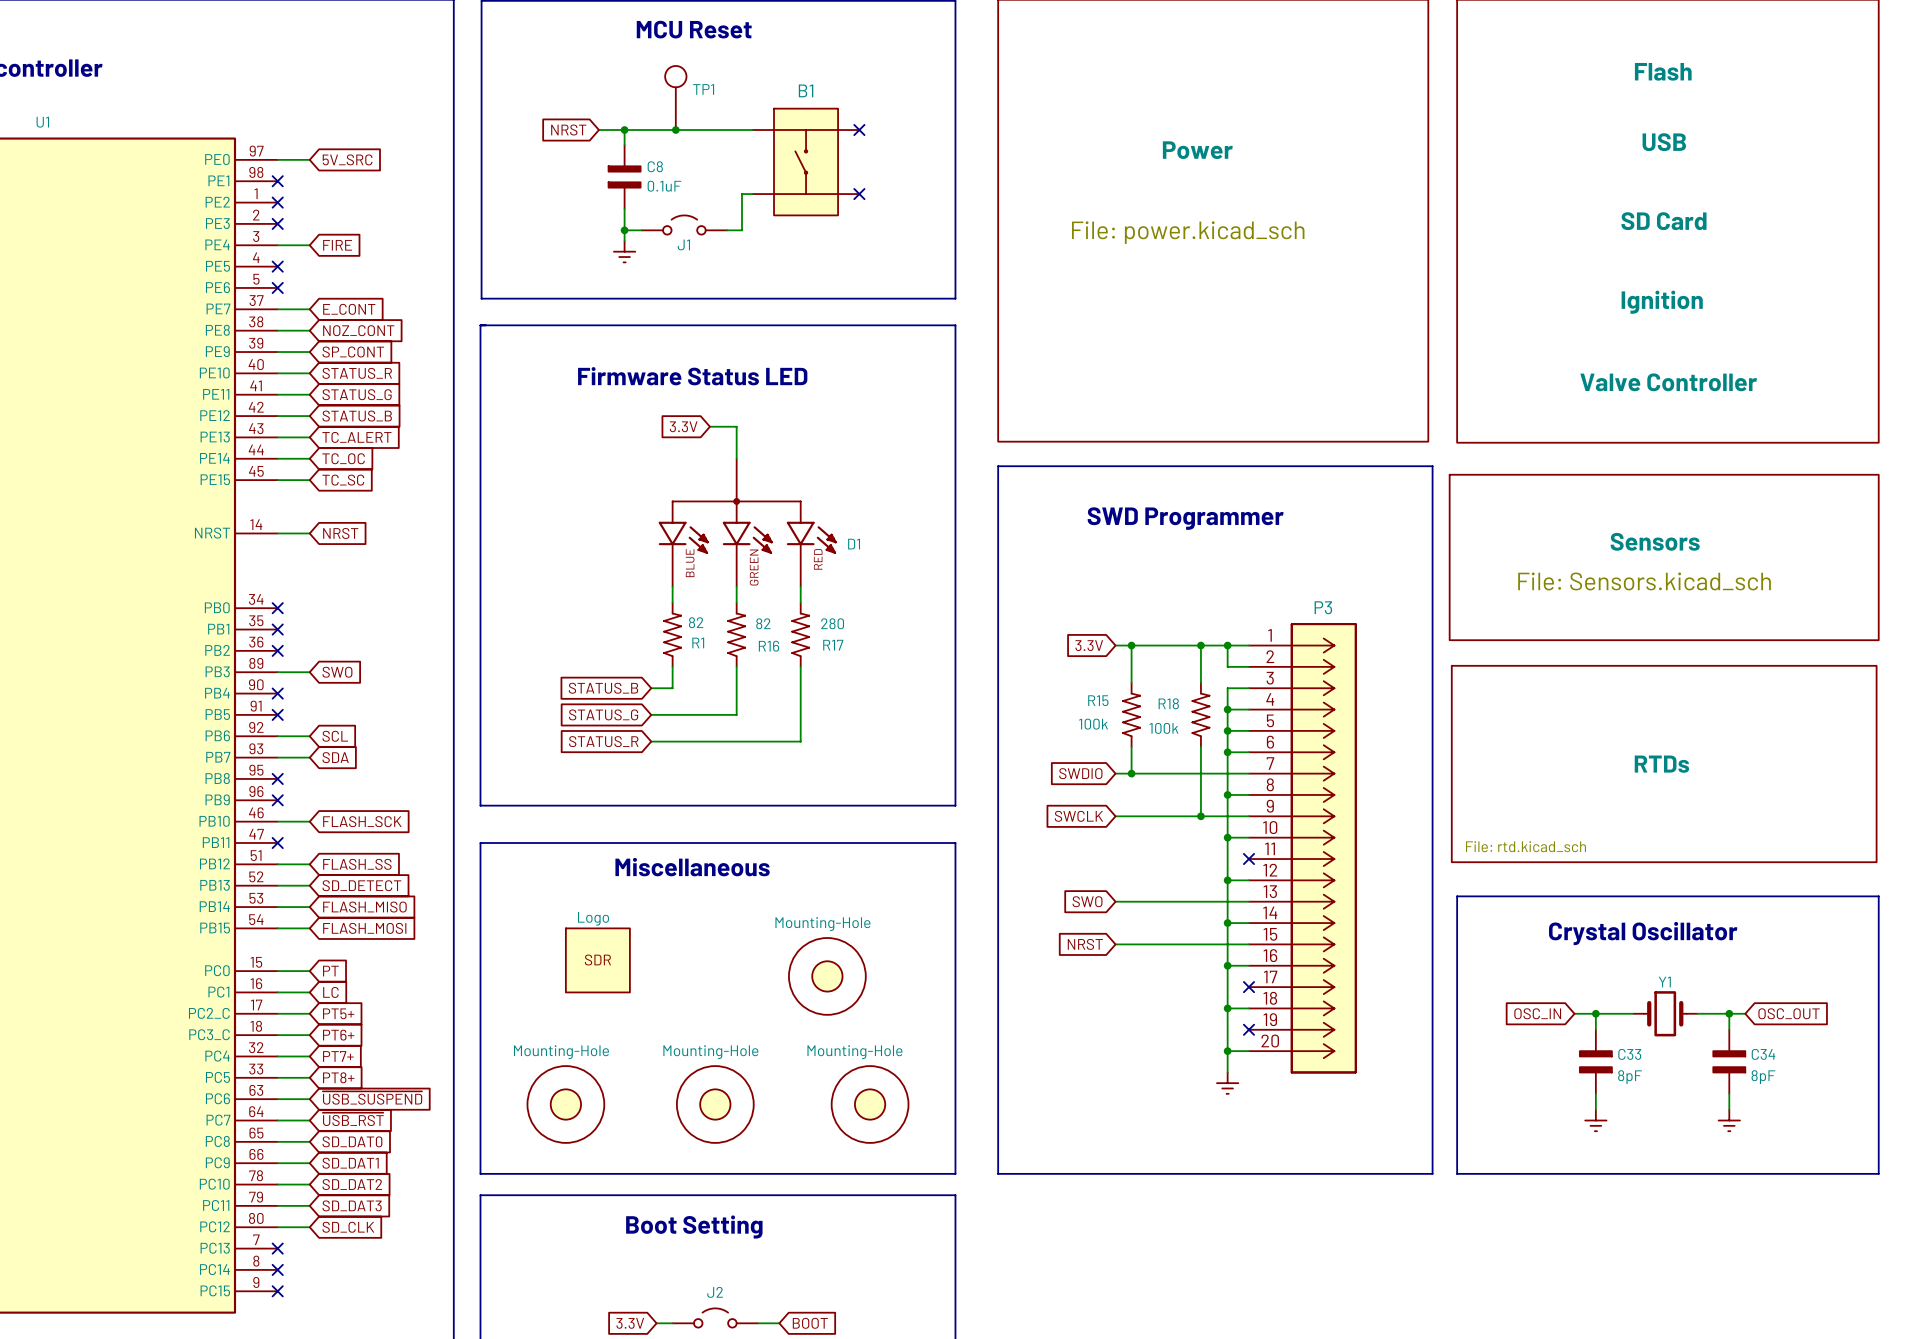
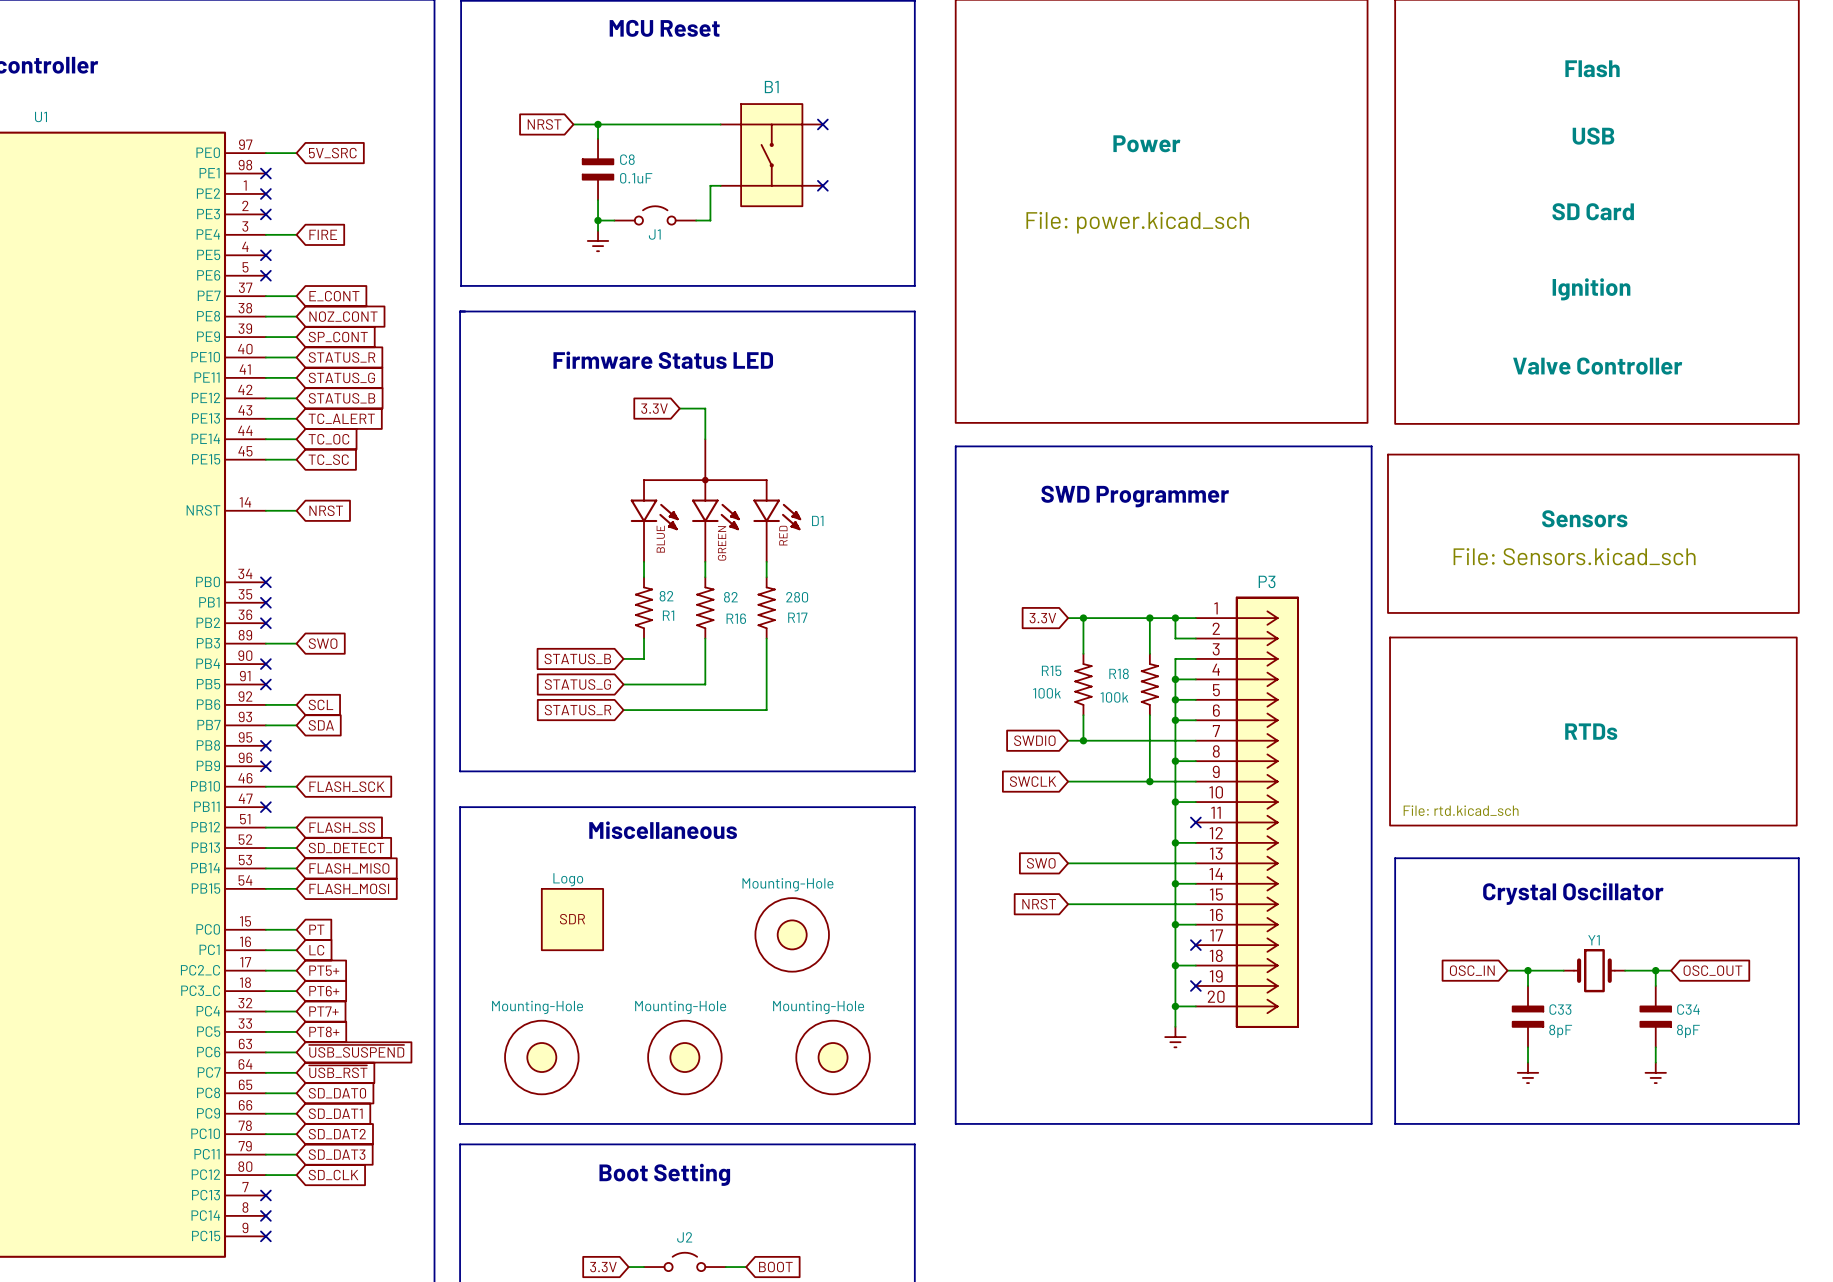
TP1: (675, 97) -> none
junction: (675, 130) -> none

